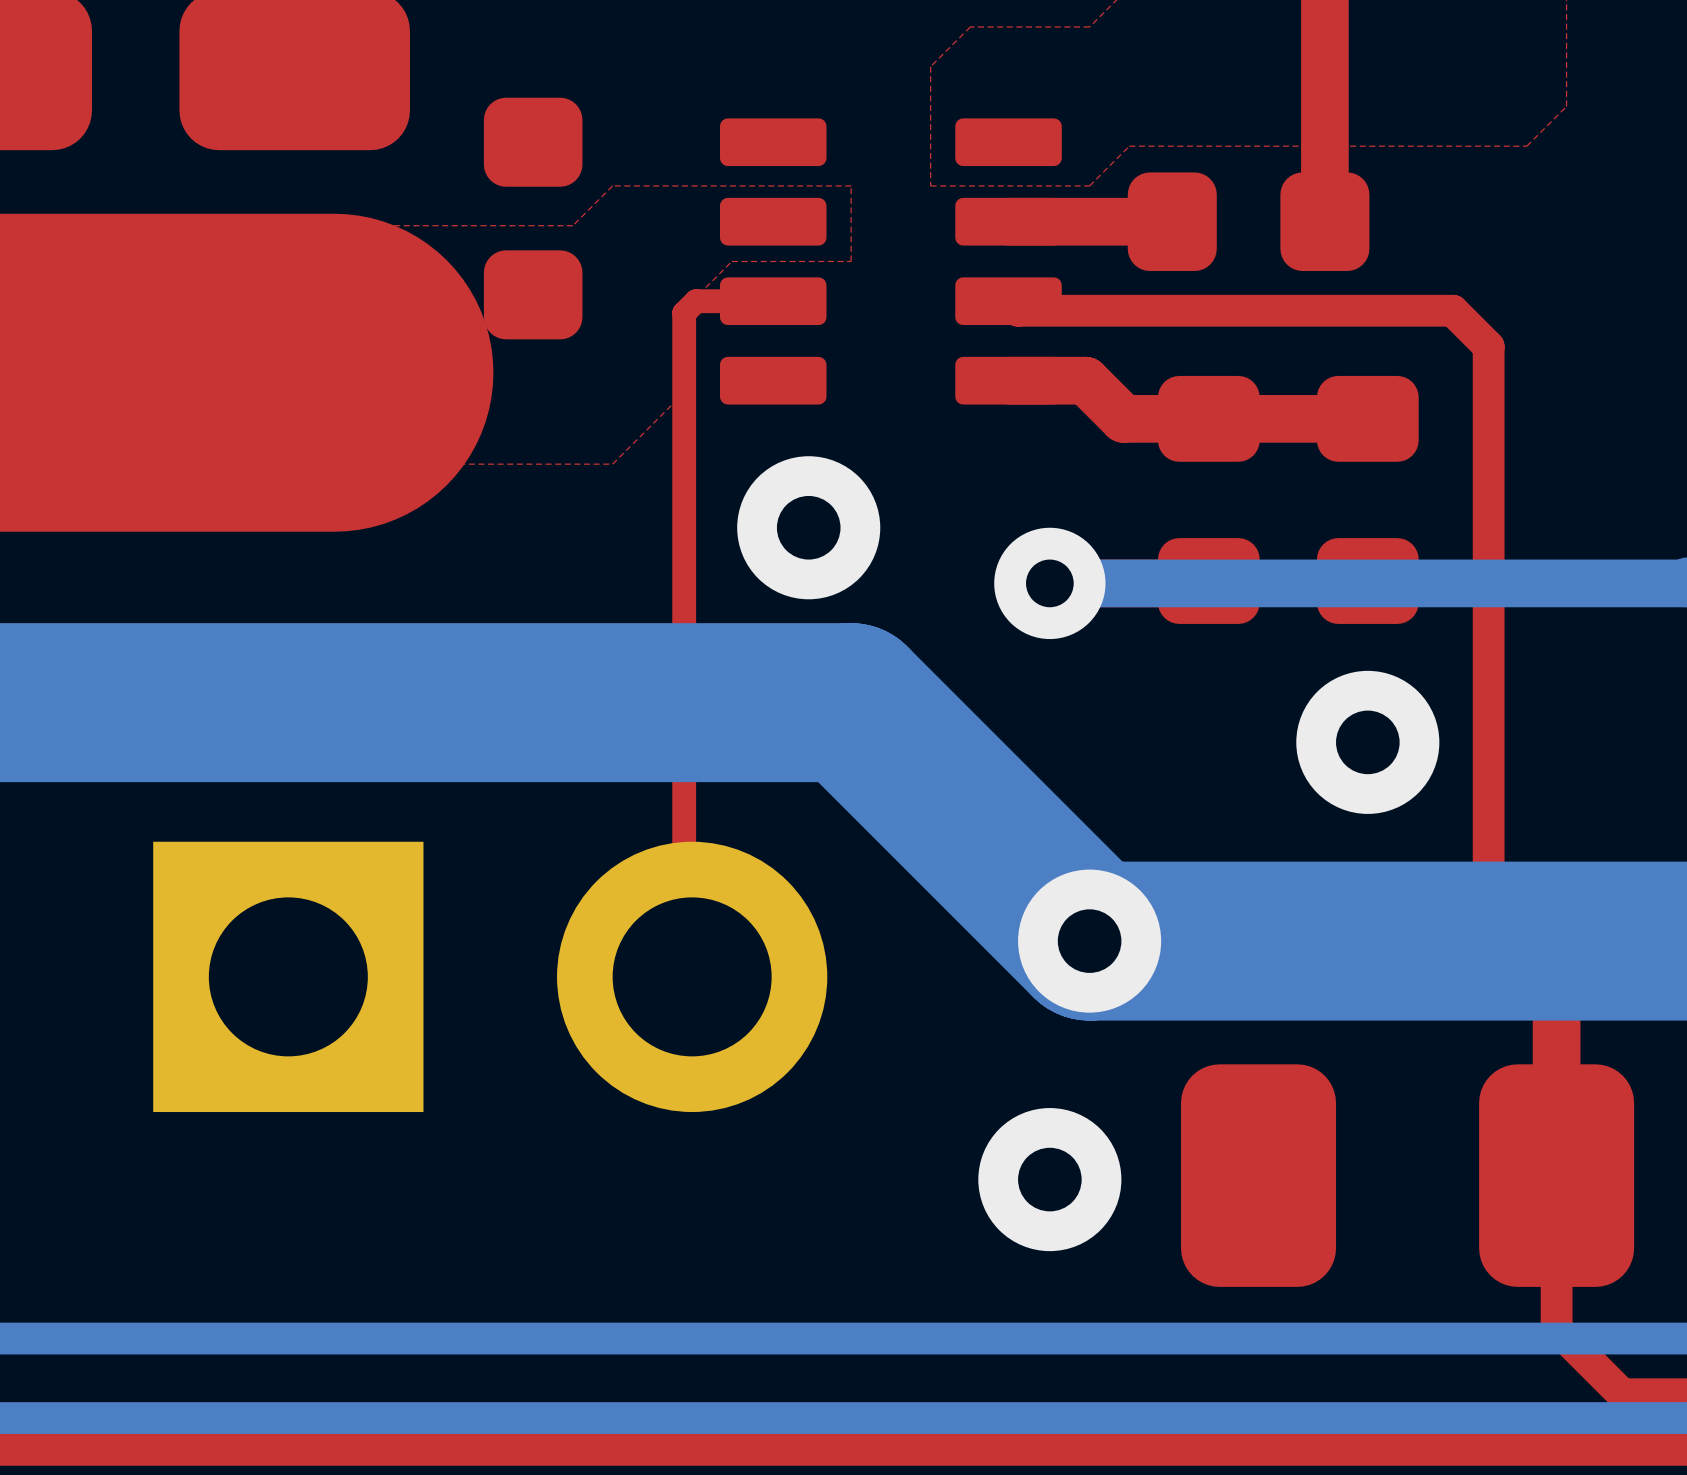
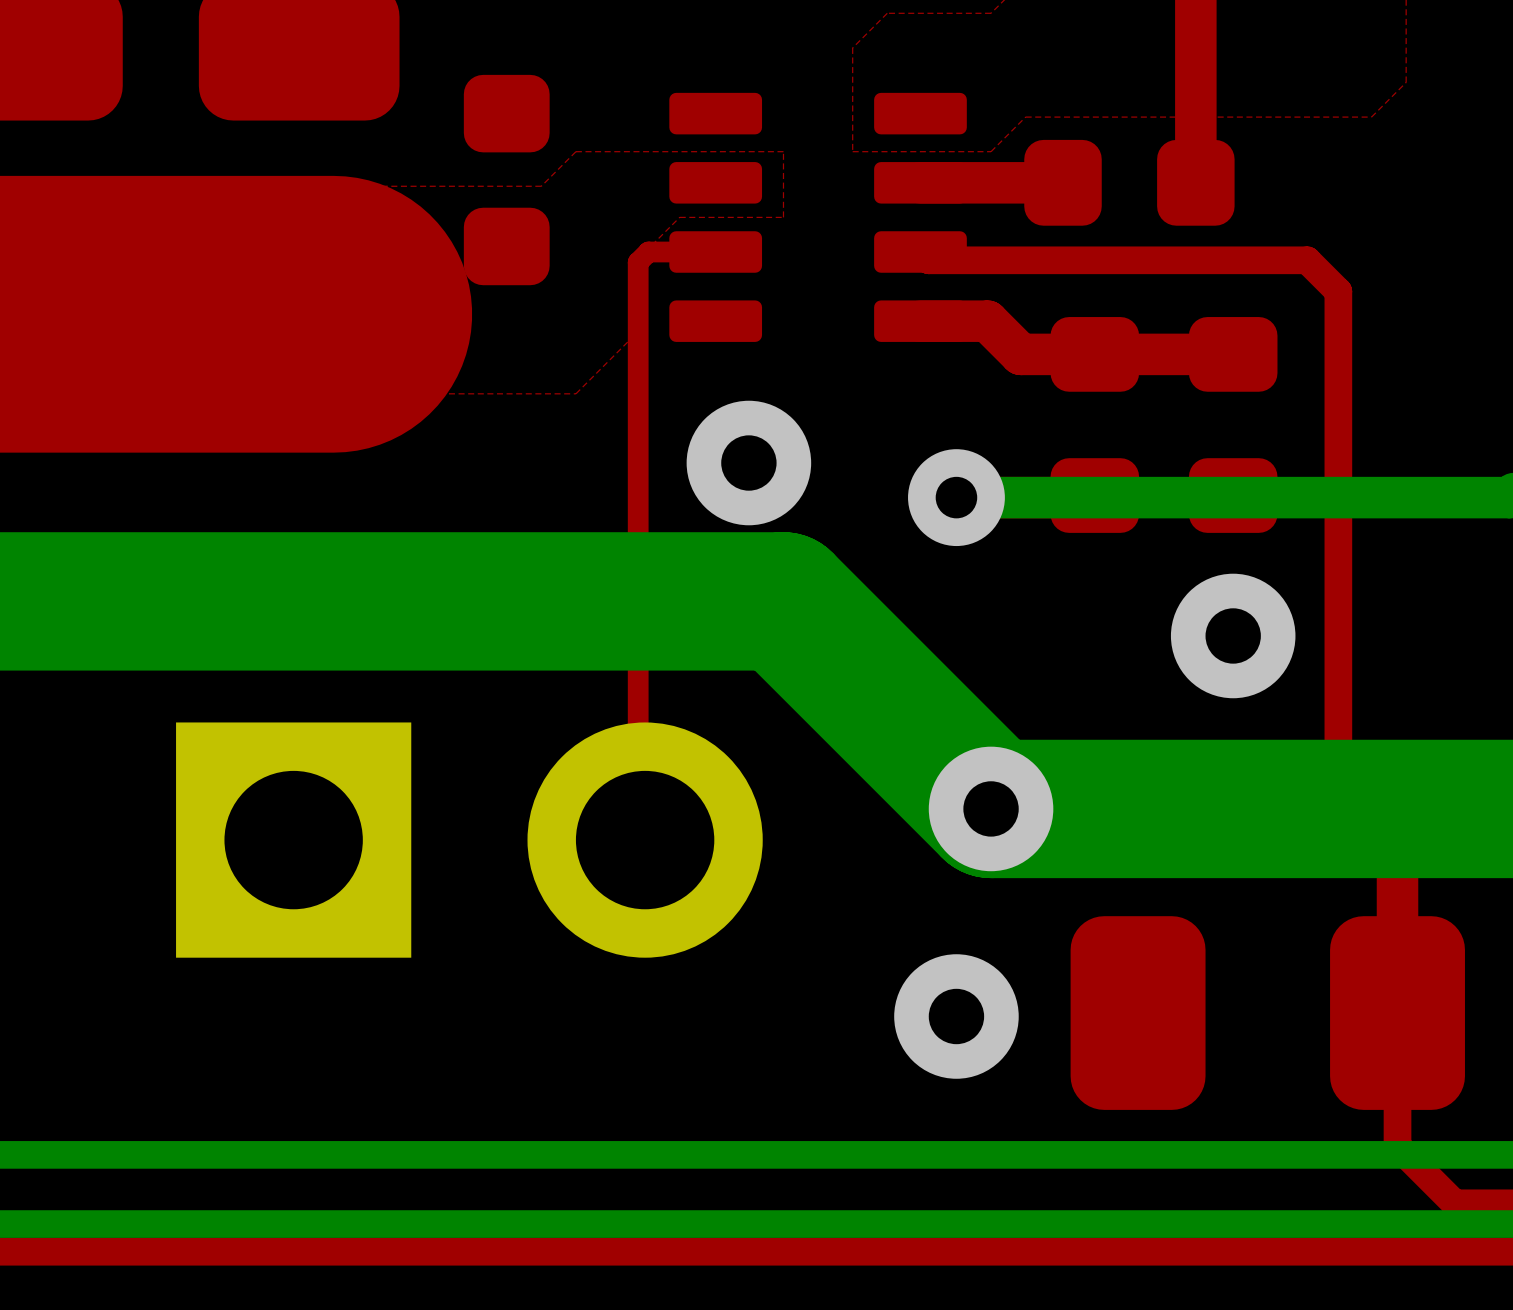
via position: (808, 527) -> (748, 463)

